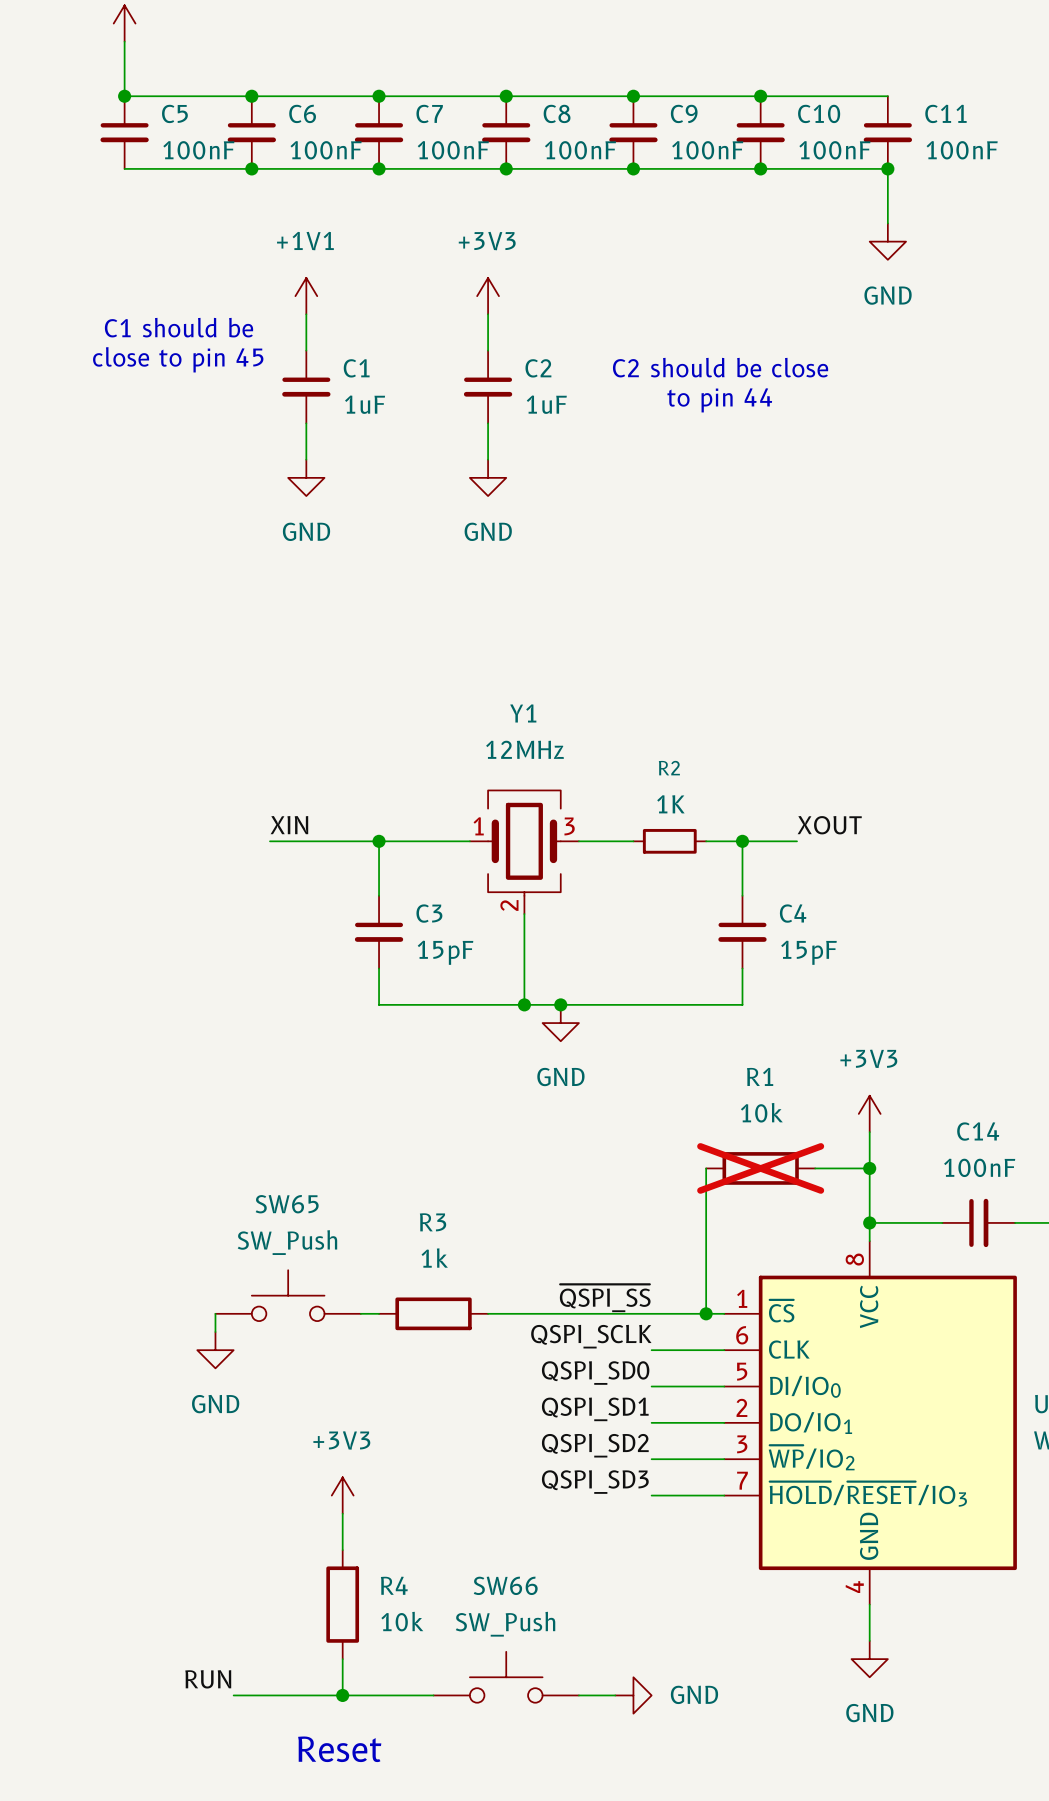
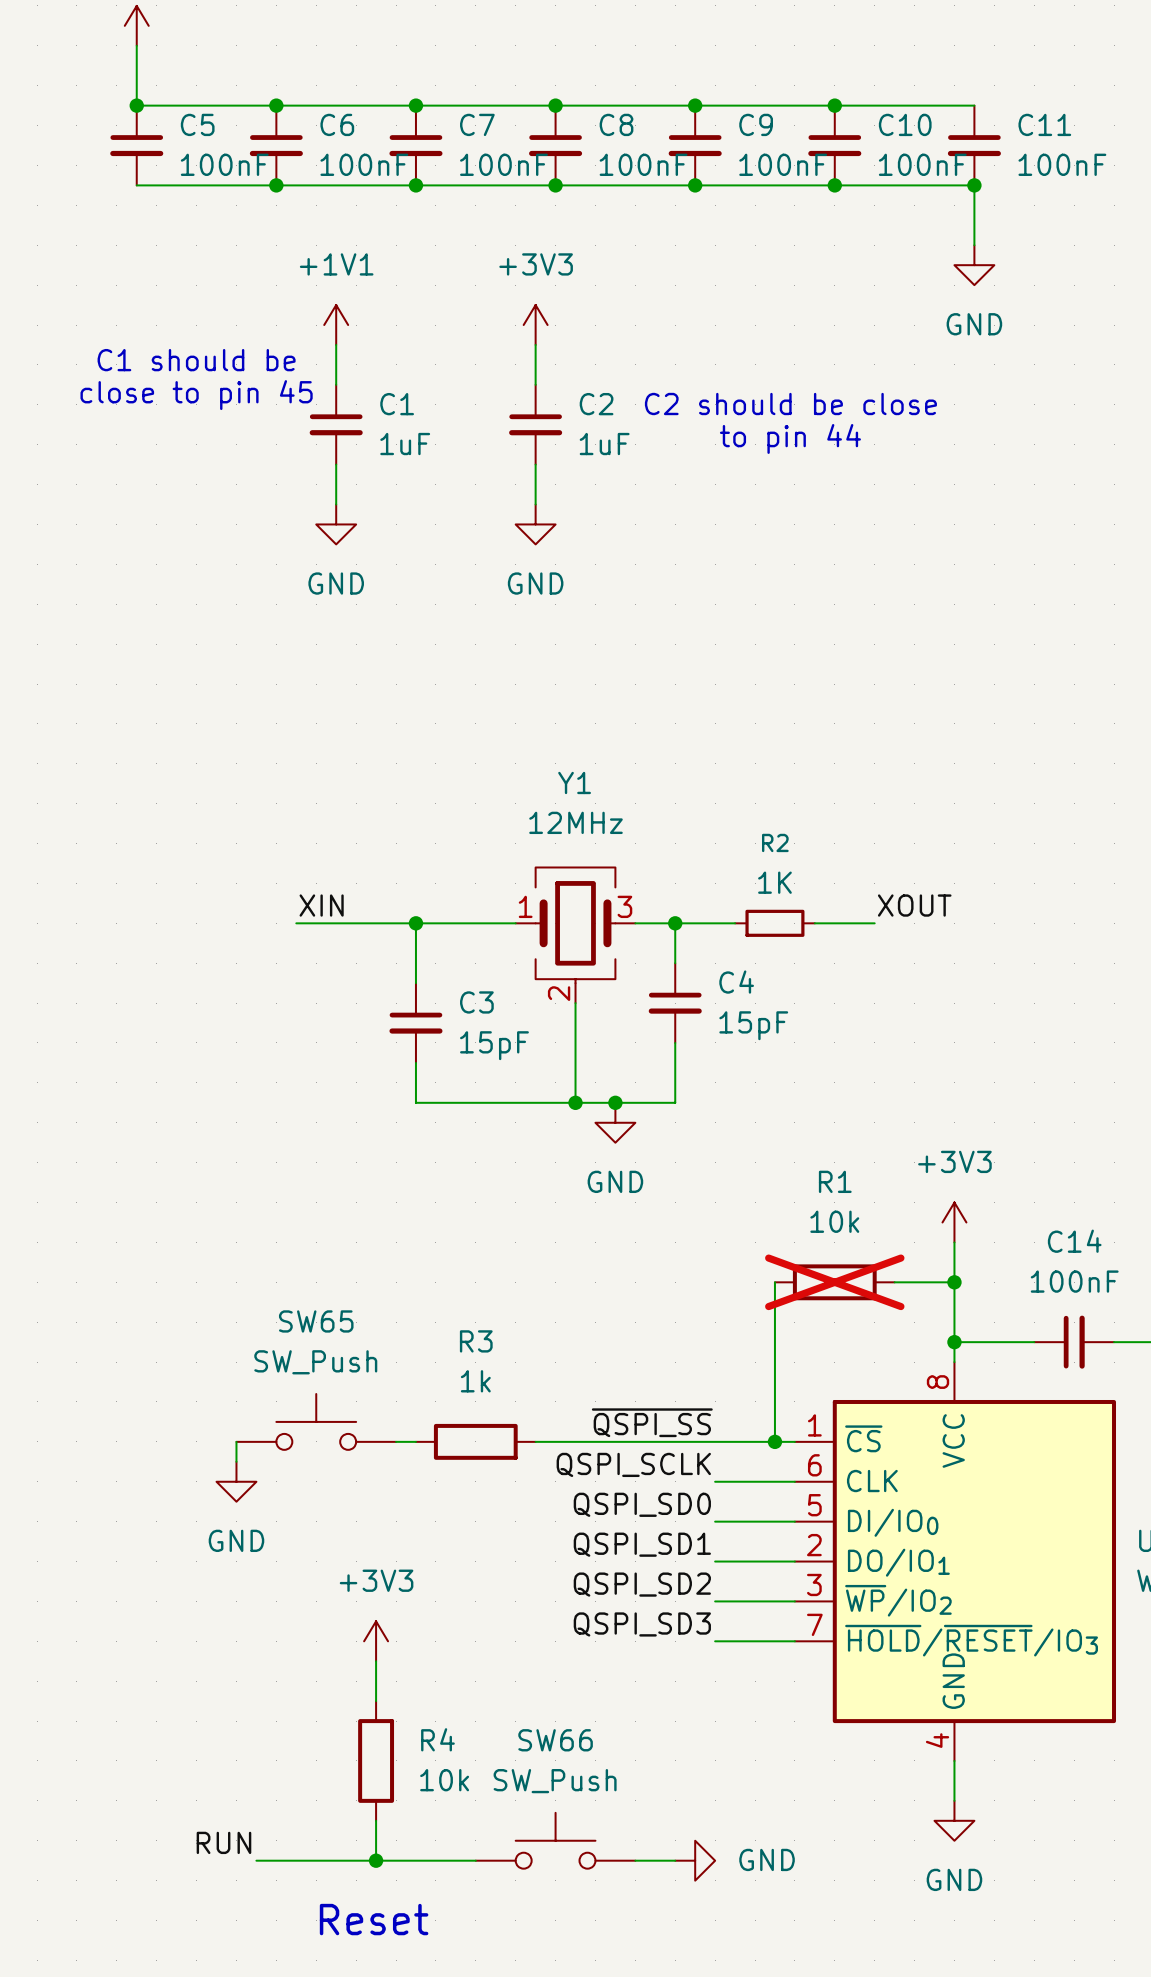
wire: none -> (675, 923) (675, 963)
junction: none -> (675, 923)
wire: none -> (695, 923) (735, 923)
R2 position: (669, 841) -> (774, 923)
wire: (706, 841) (742, 841) (742, 895) -> none
junction: (742, 841) -> none
C4 position: (742, 932) -> (675, 1003)
wire: (742, 968) (742, 1004) (615, 1004) -> (675, 1042) (675, 1102)

